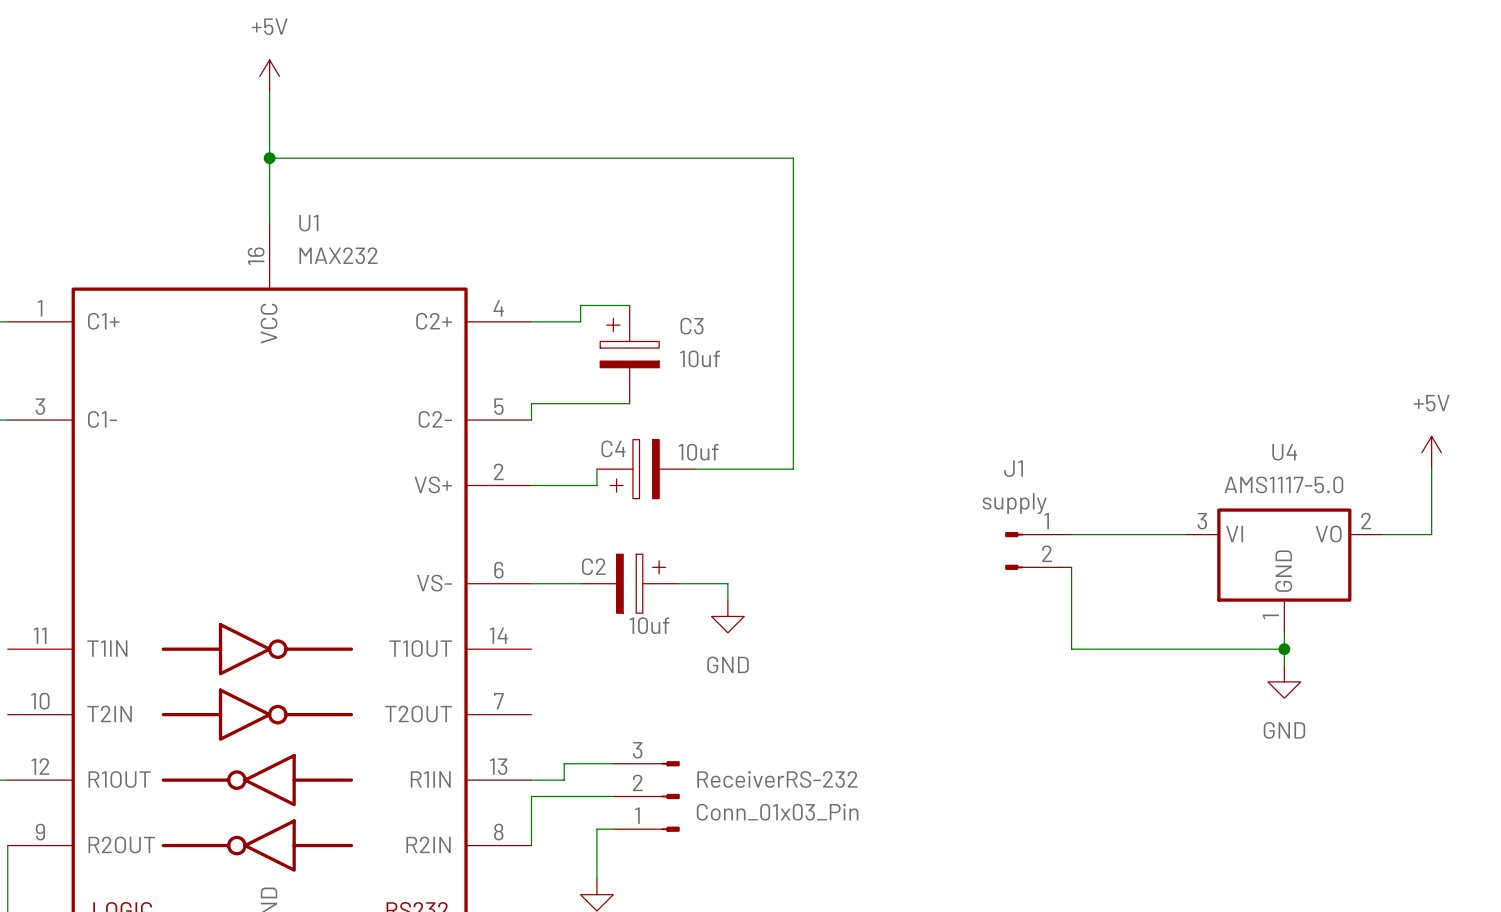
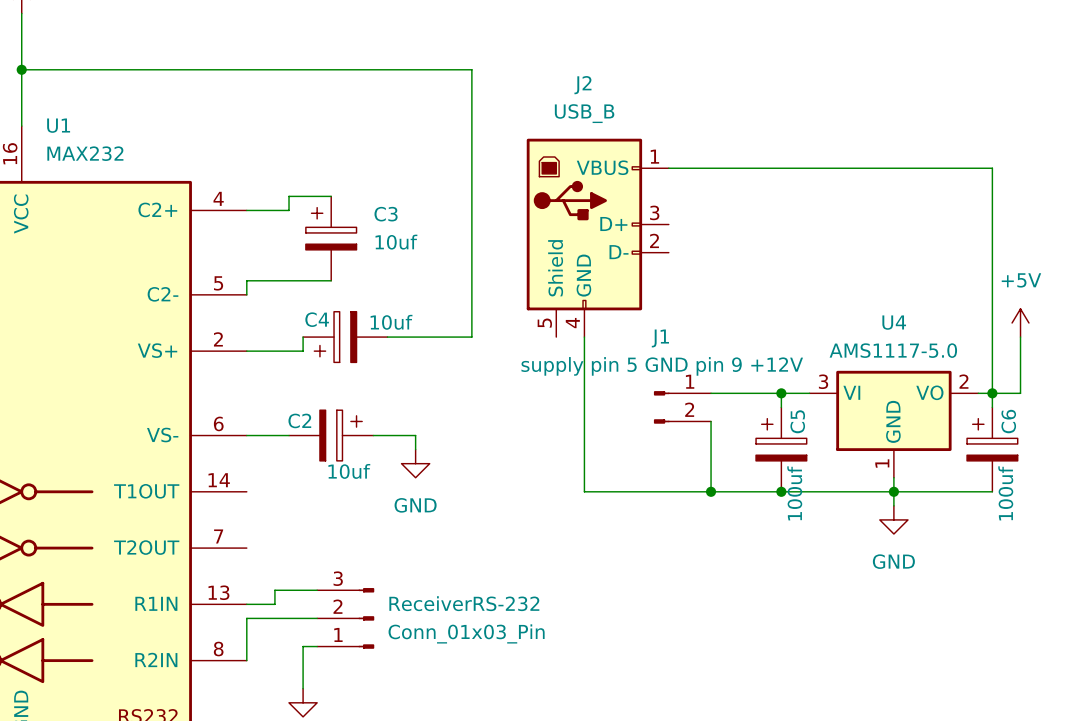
wire: none -> (668, 168) (992, 168) (992, 407)
J2: none -> USB_B (597, 237)
wire: none -> (584, 337) (584, 491) (711, 491)
J1 value: supply (1014, 503) -> supply pin 5 GND pin 9 +12V (662, 366)
wire: none -> (781, 393) (781, 407)
junction: none -> (781, 393)
junction: none -> (992, 393)
C5: none -> 100uf (781, 449)
C6: none -> 100uf (992, 449)
junction: none -> (711, 491)
junction: none -> (781, 491)
wire: none -> (893, 491) (992, 491)

